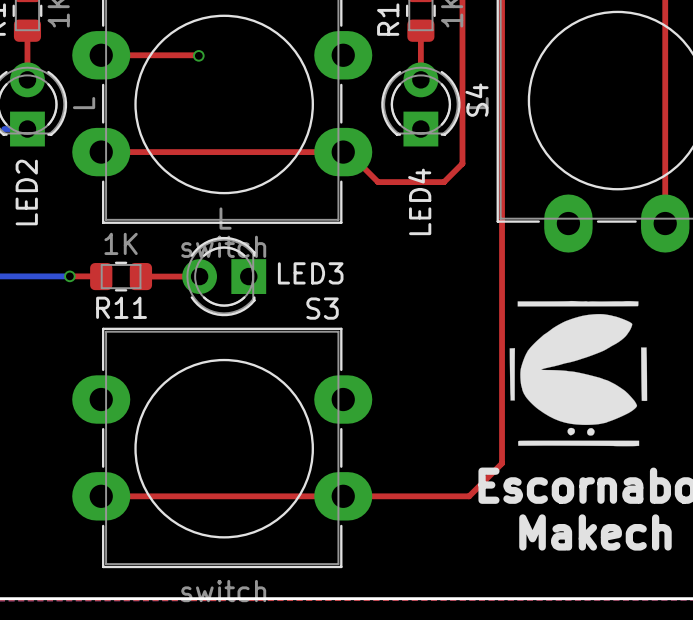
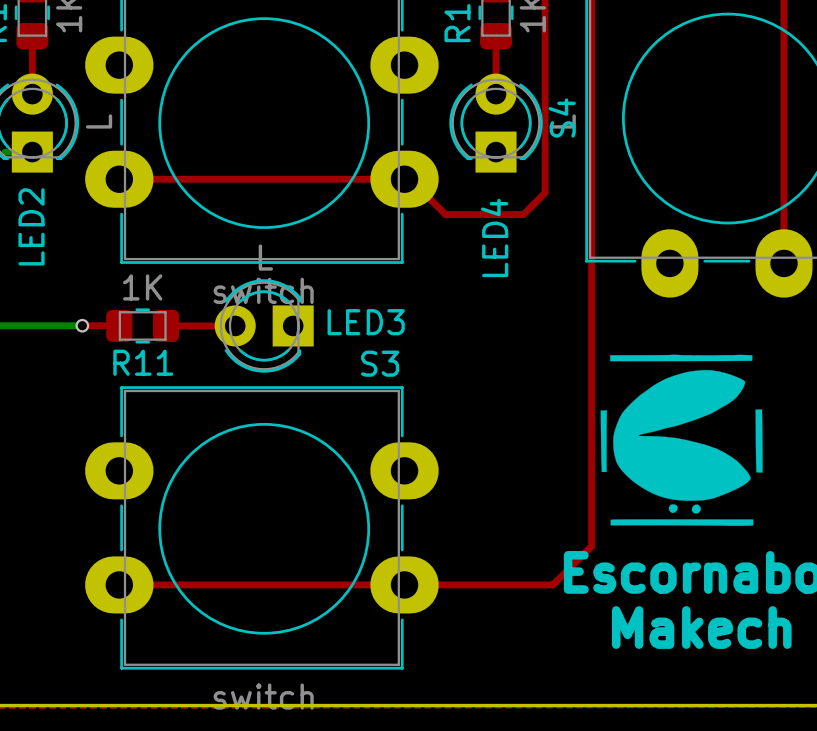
top track: (101, 55) (198, 55) -> none
via: (198, 55) -> none

